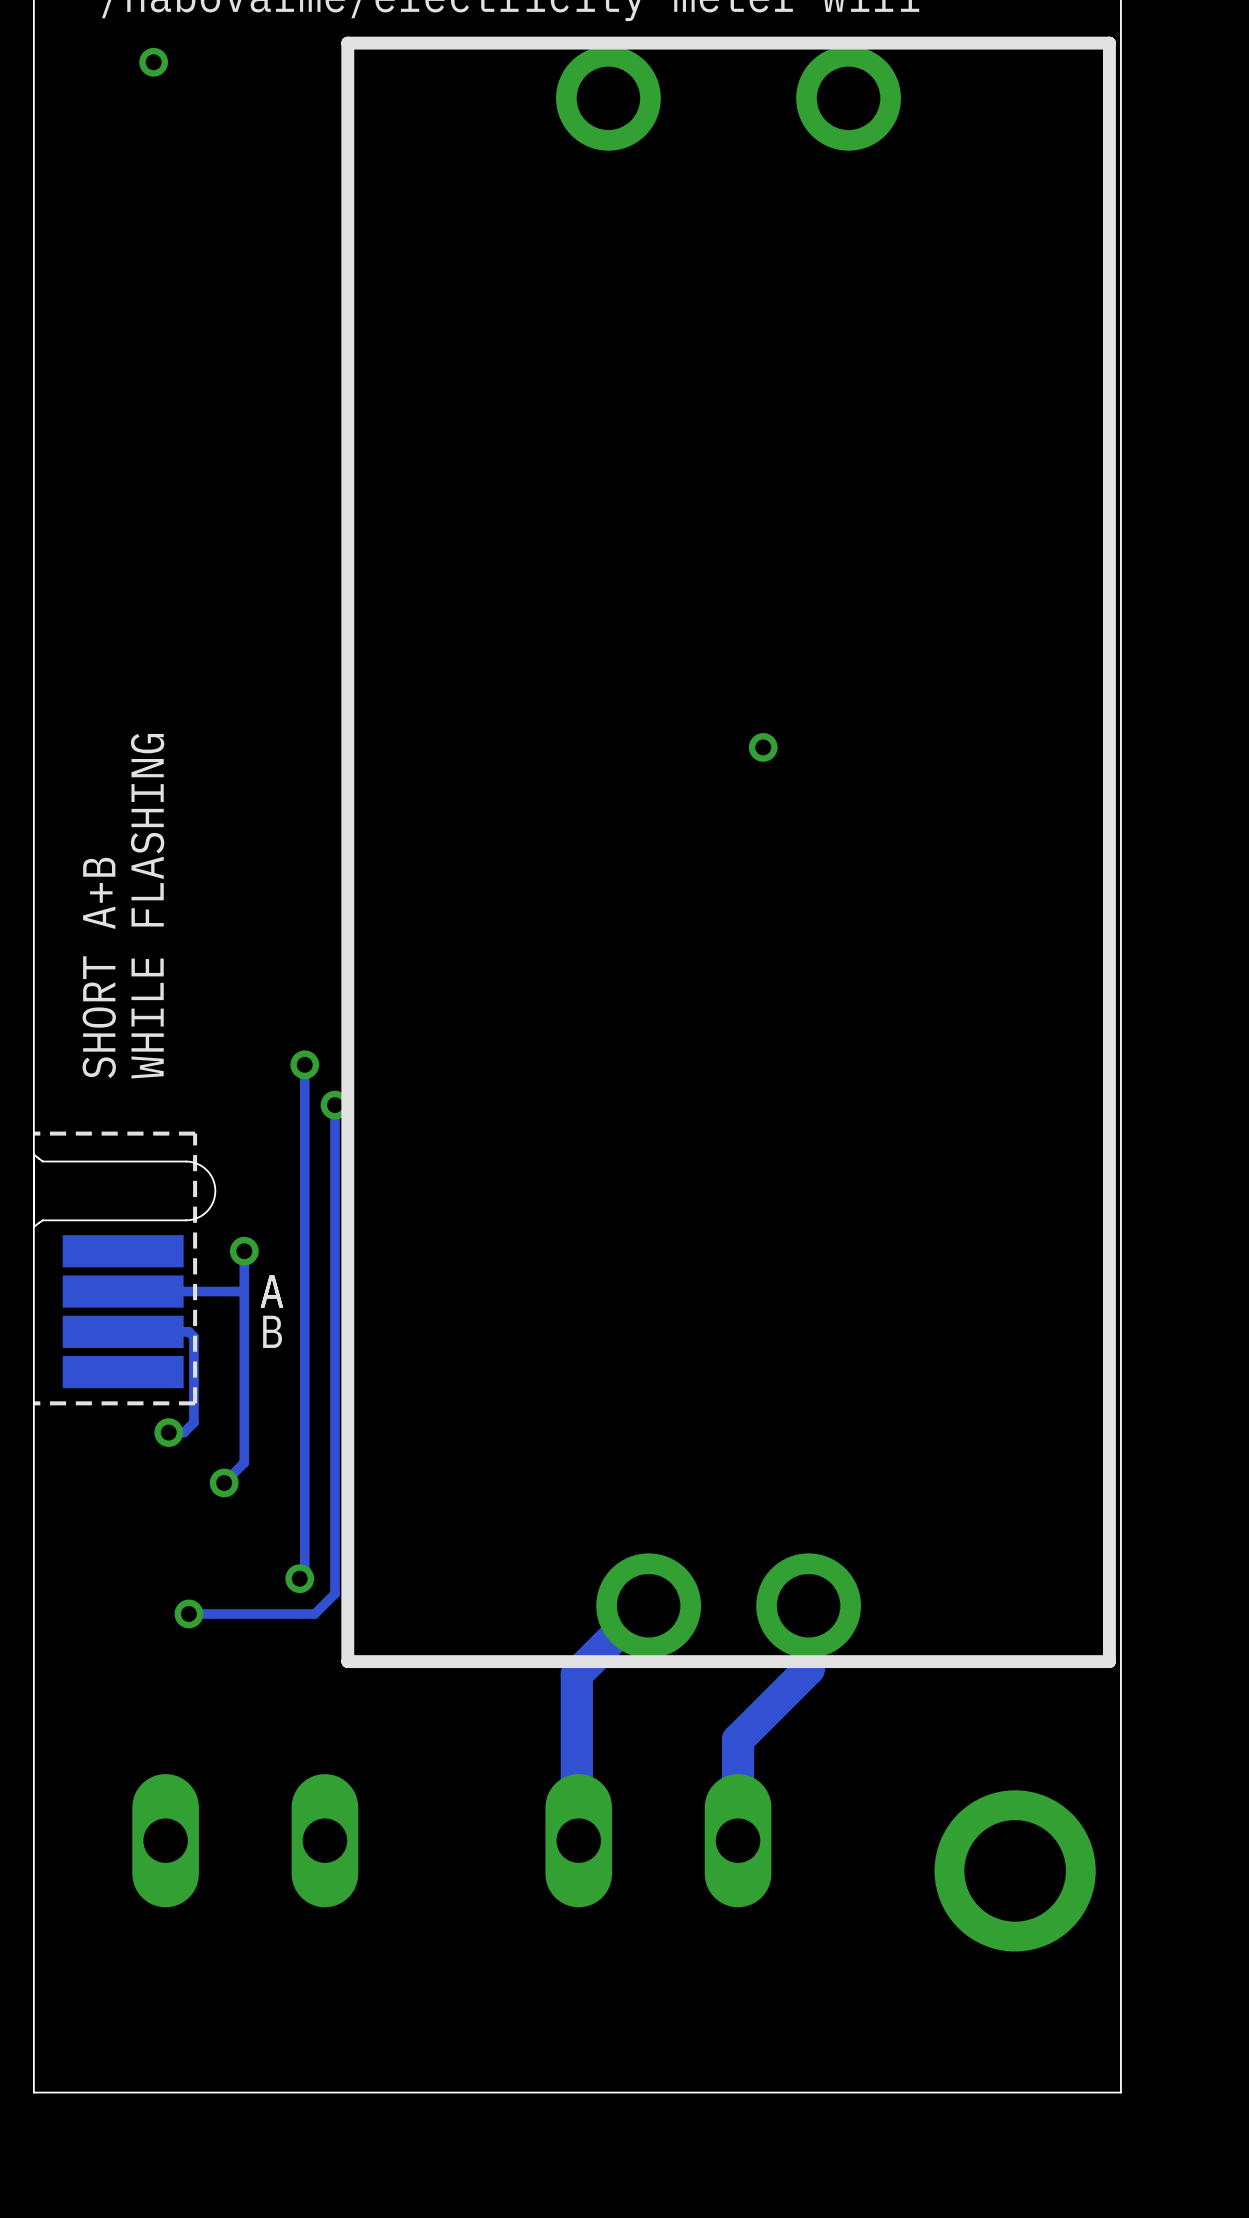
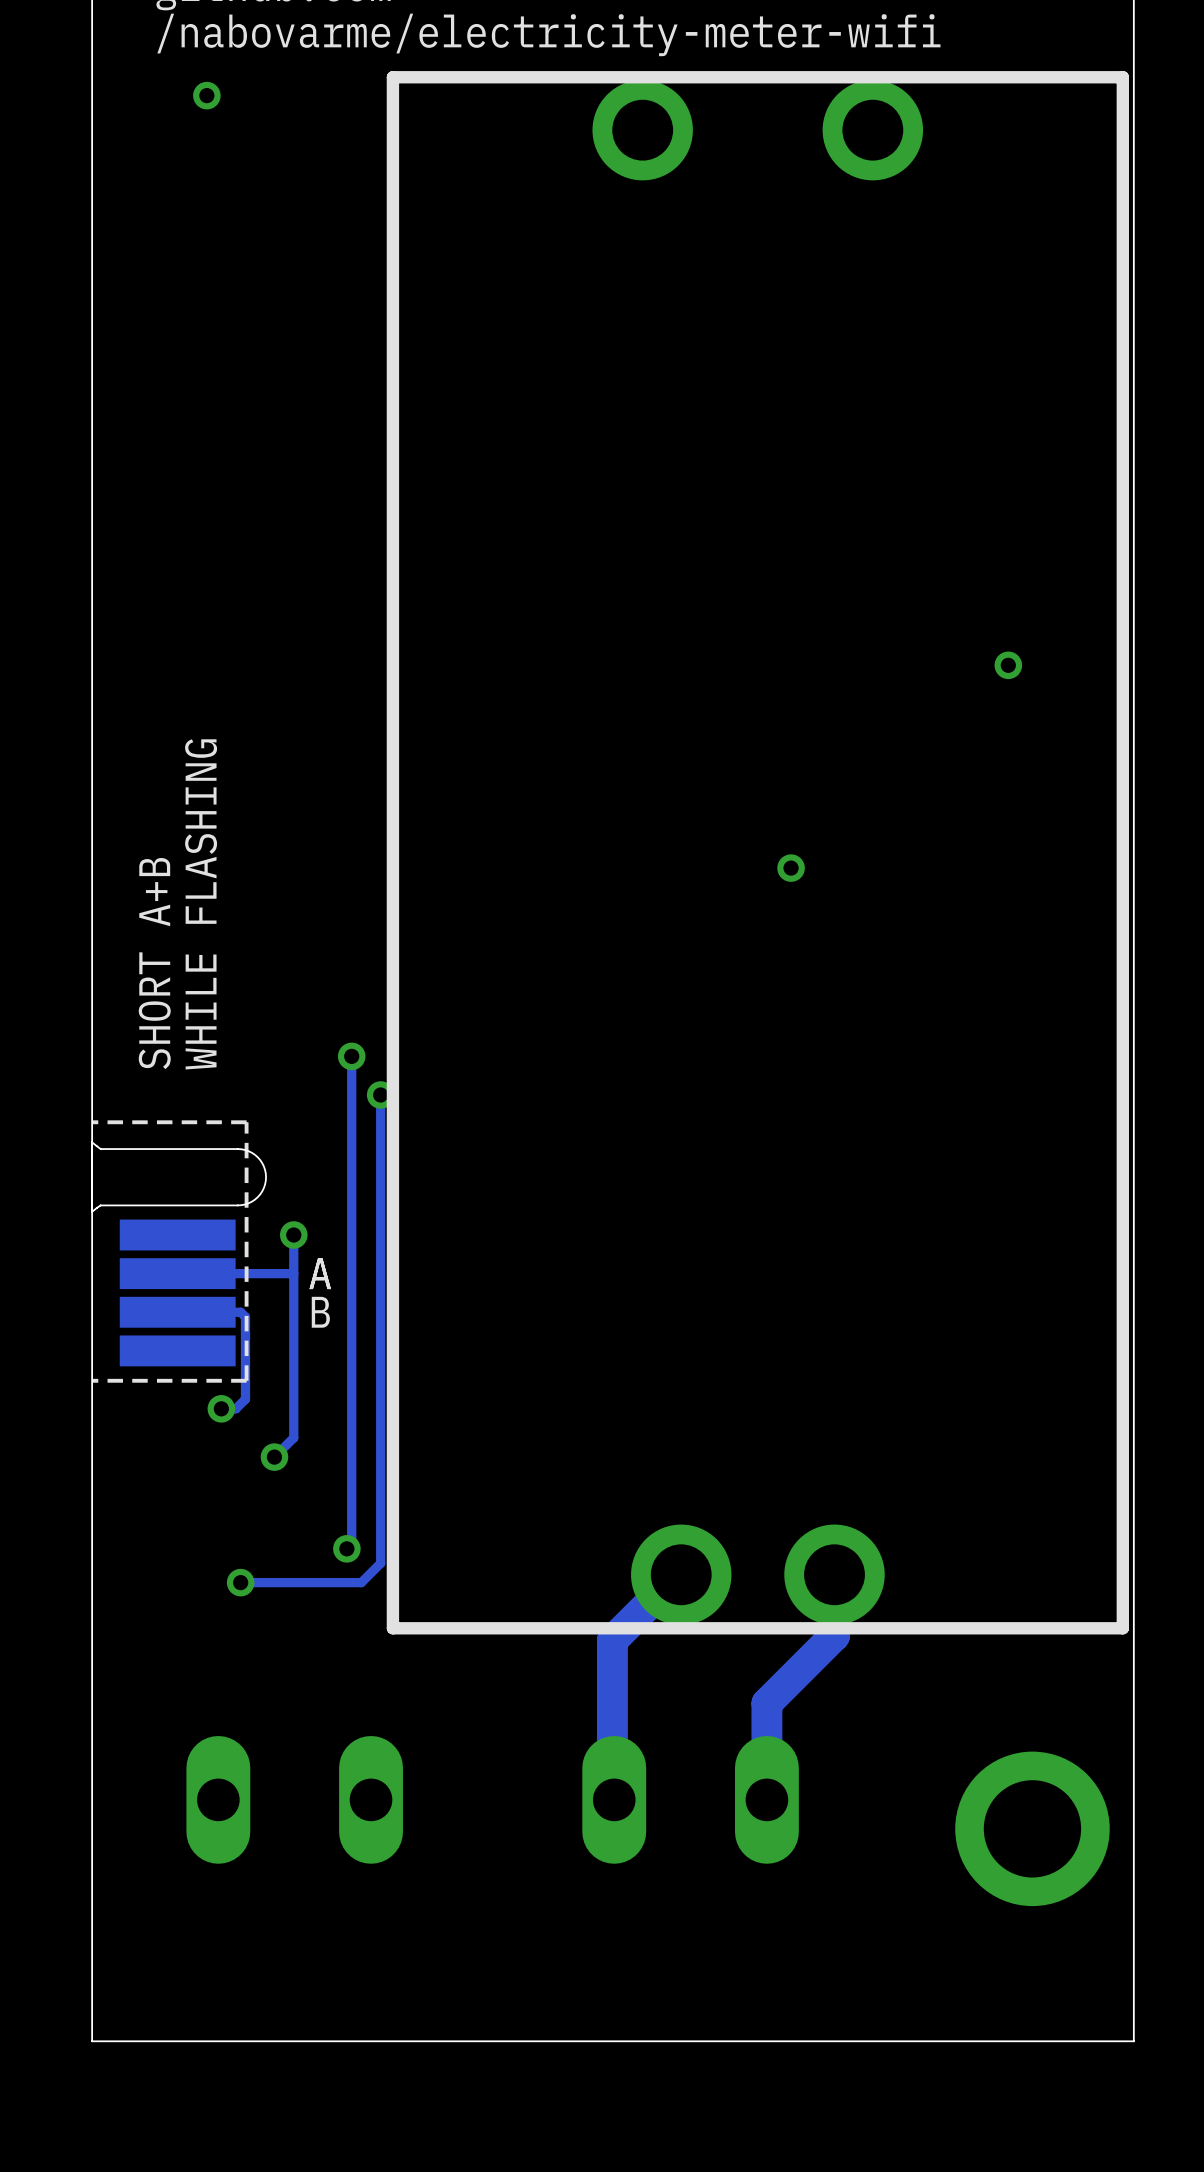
via: none -> (1008, 665)
via position: (763, 747) -> (791, 868)

